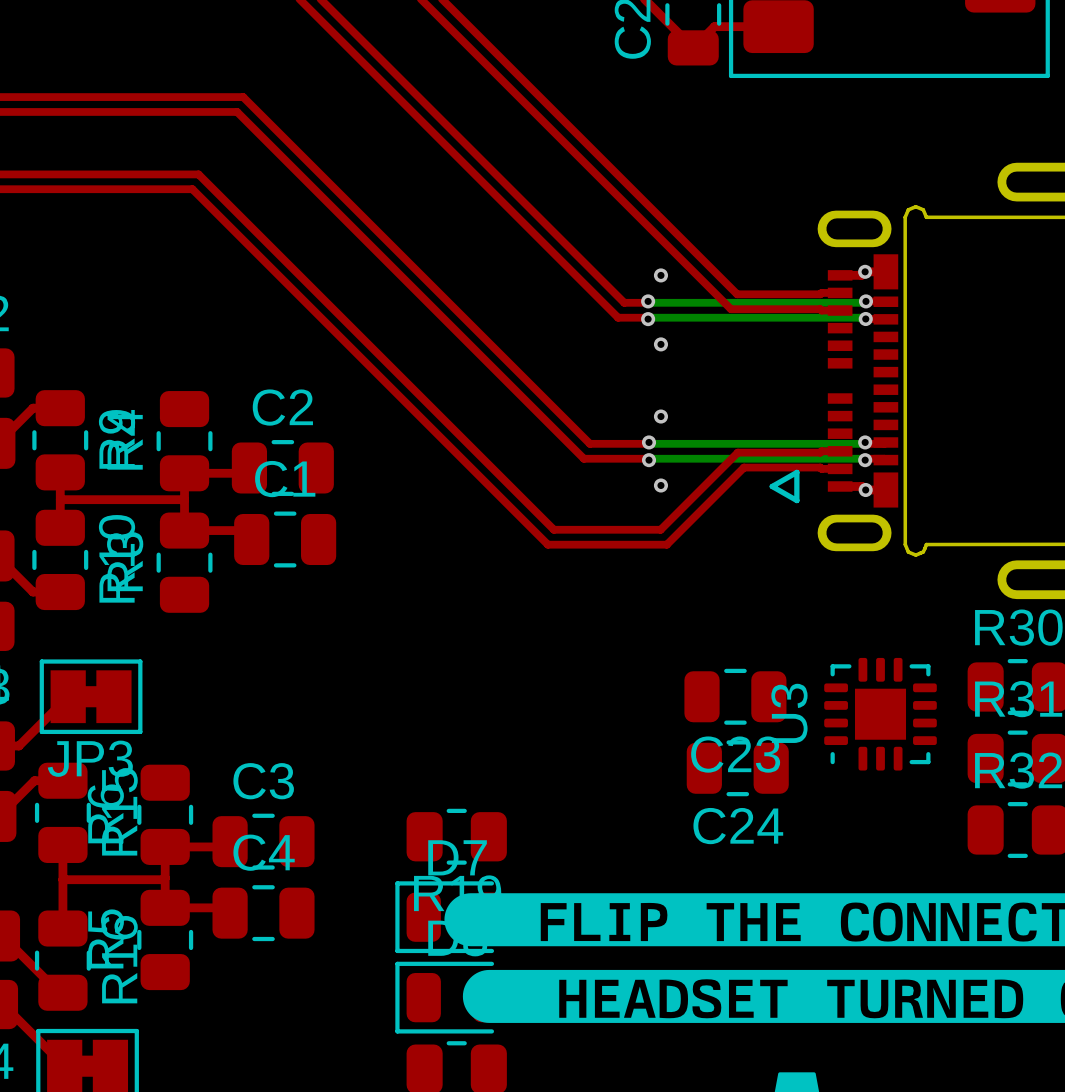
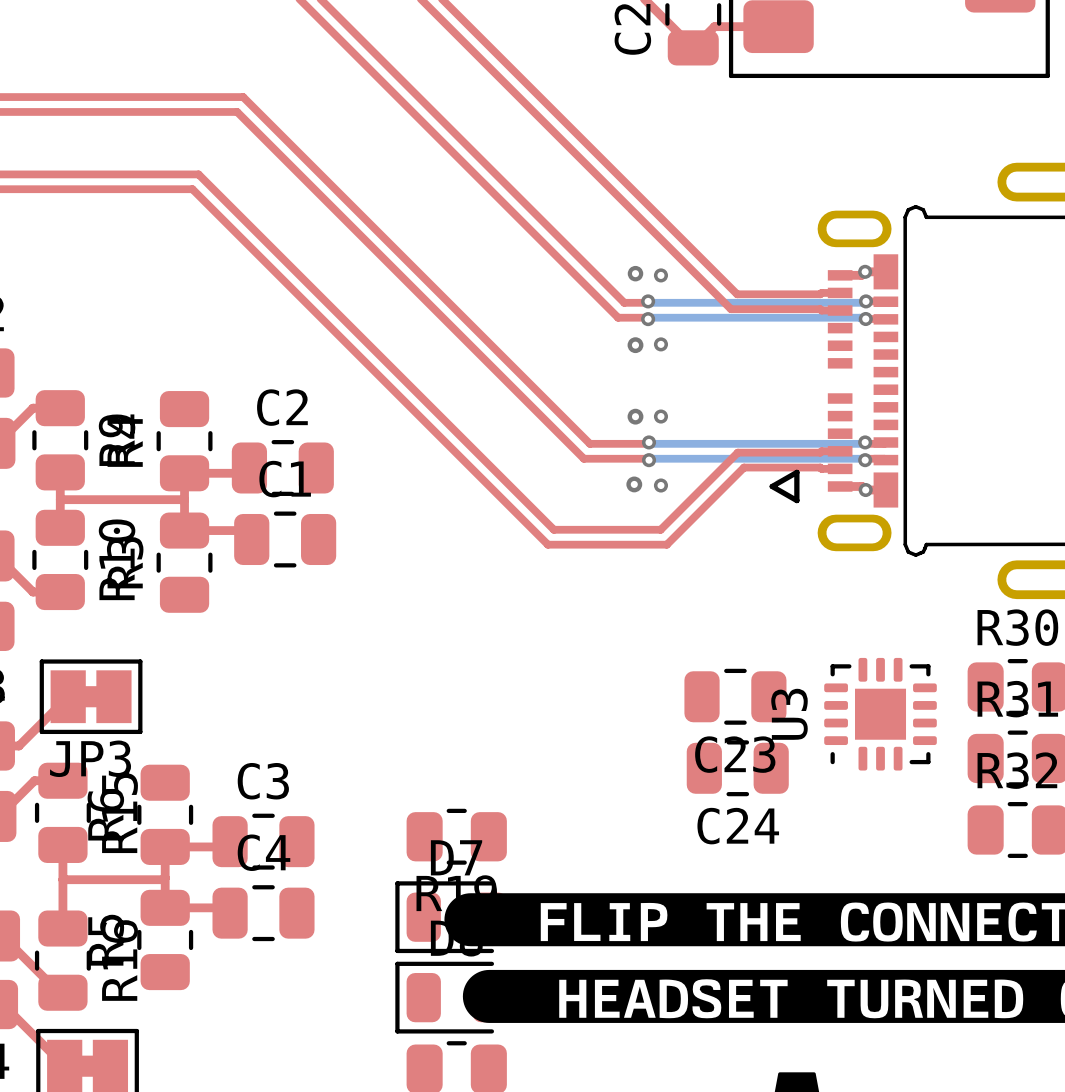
via: none -> (635, 273)
via: none -> (635, 345)
via: none -> (635, 416)
via: none -> (634, 484)

